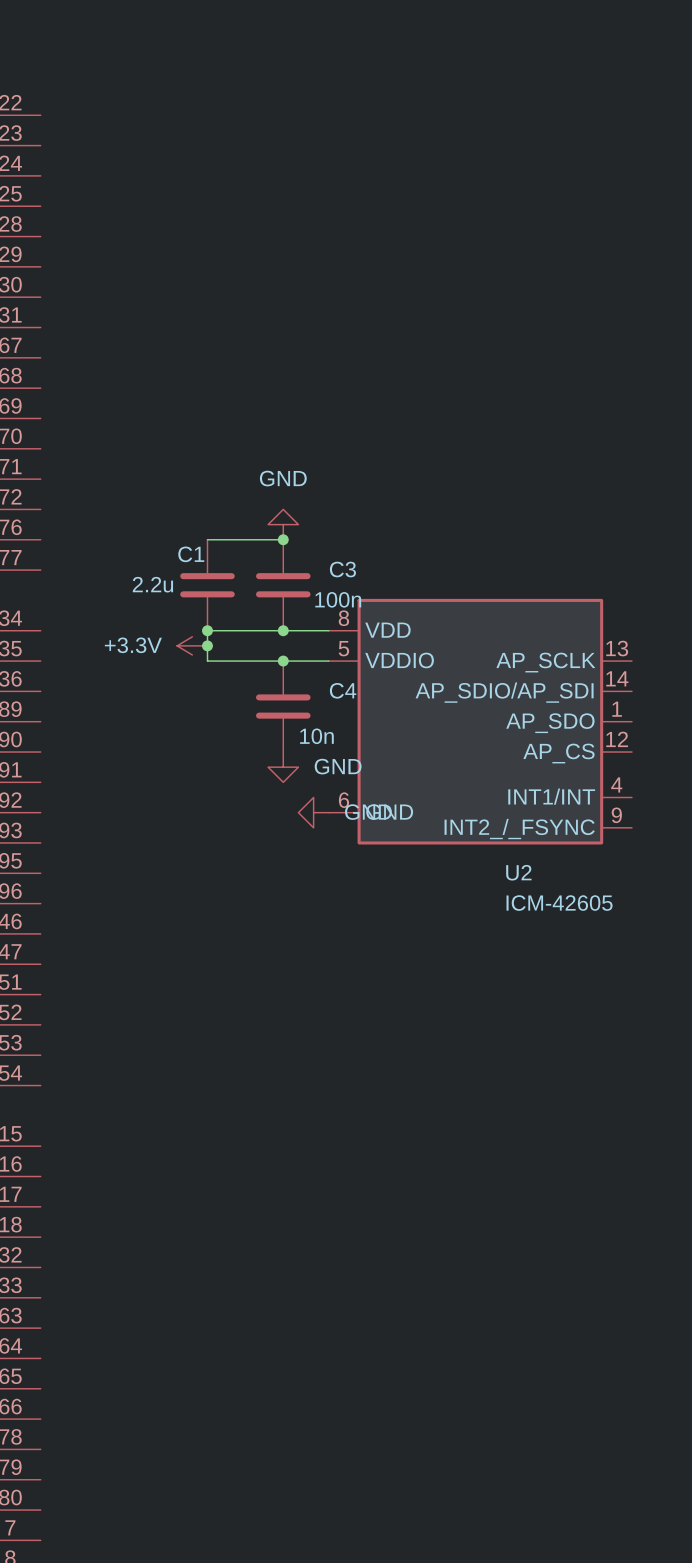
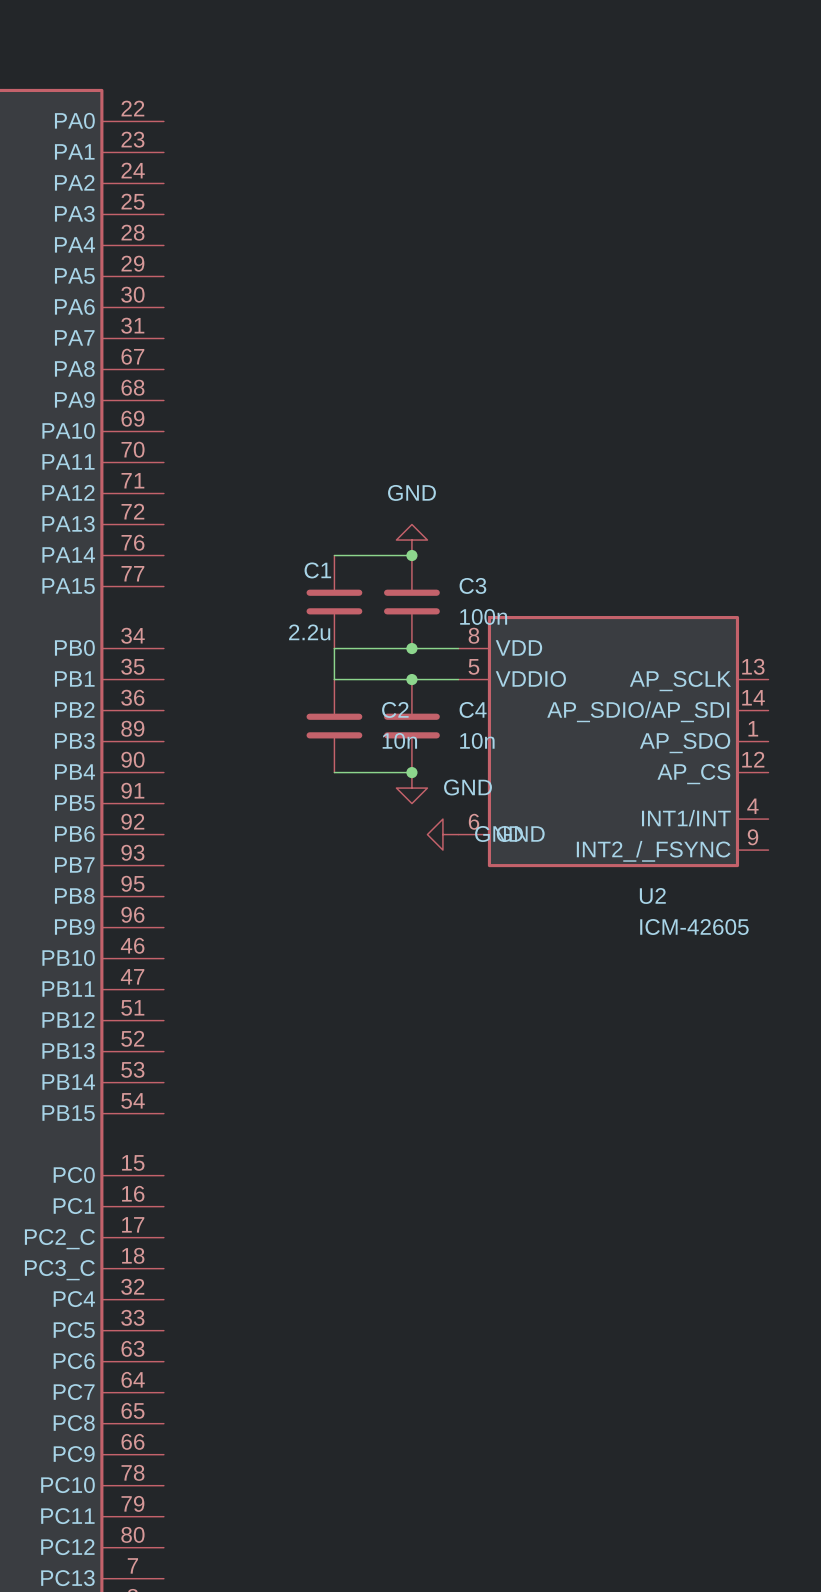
C1 value position: 2.2u (152, 584) -> 2.2u (309, 632)
C3 value position: 100n (338, 599) -> 100n (483, 616)
junction: (207, 630) -> none
power symbol: +3.3V (192, 645) -> none
junction: (207, 645) -> none
C2: none -> 10n (334, 726)
C4 value position: 10n (316, 736) -> 10n (477, 740)
wire: none -> (334, 772) (411, 772)
junction: none -> (411, 772)

